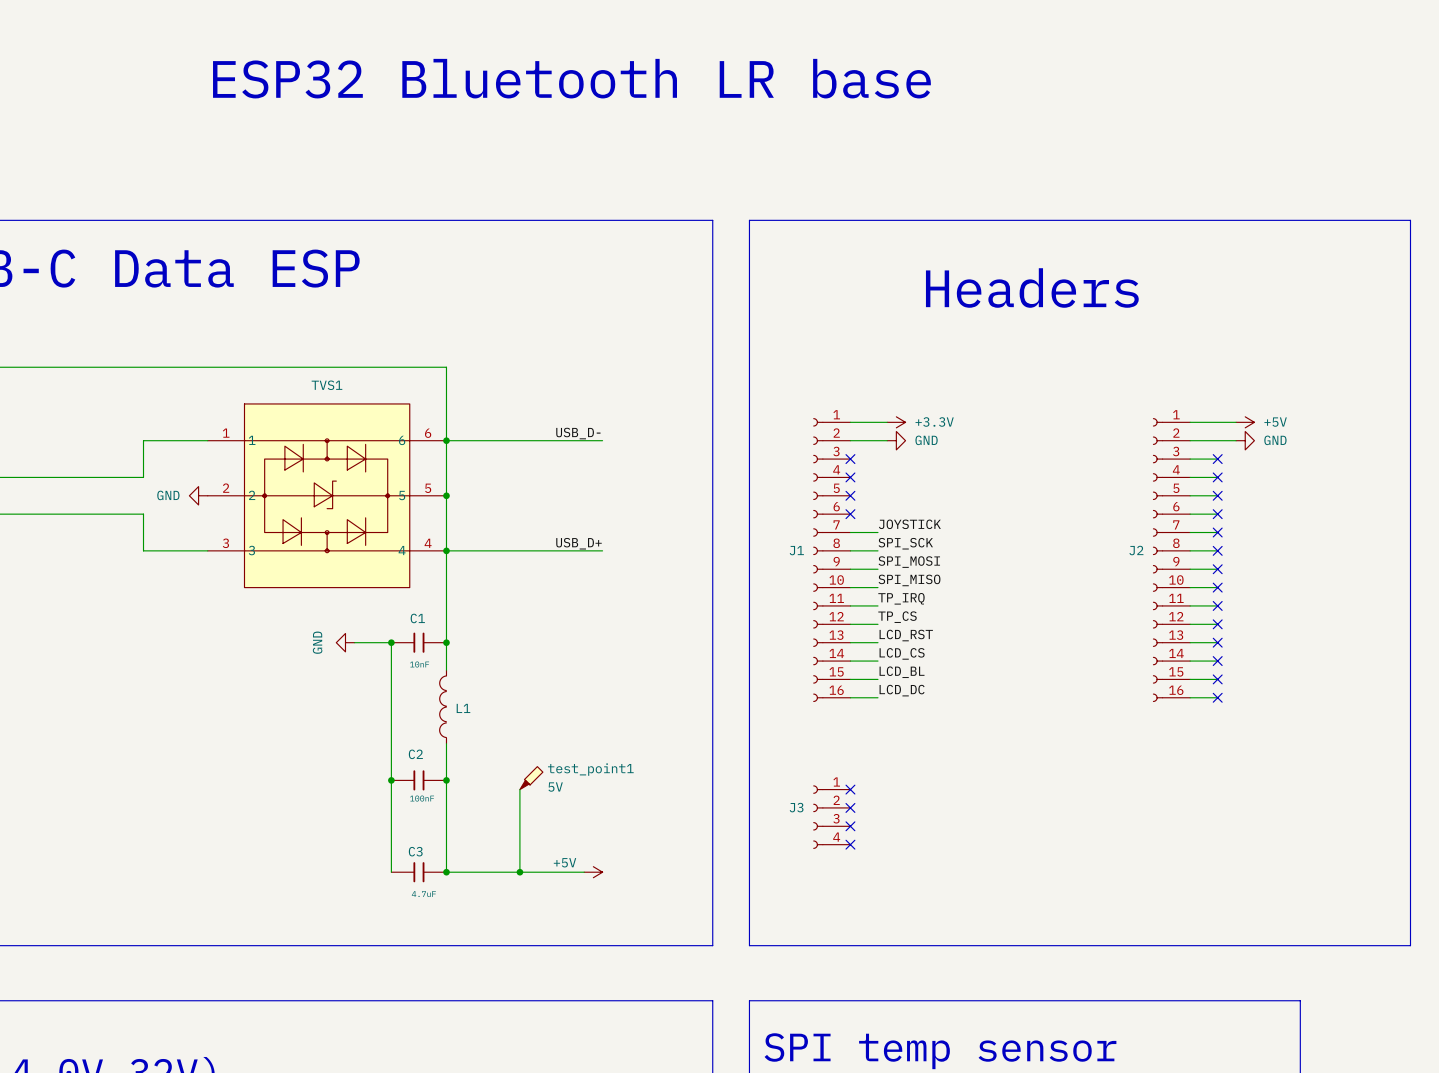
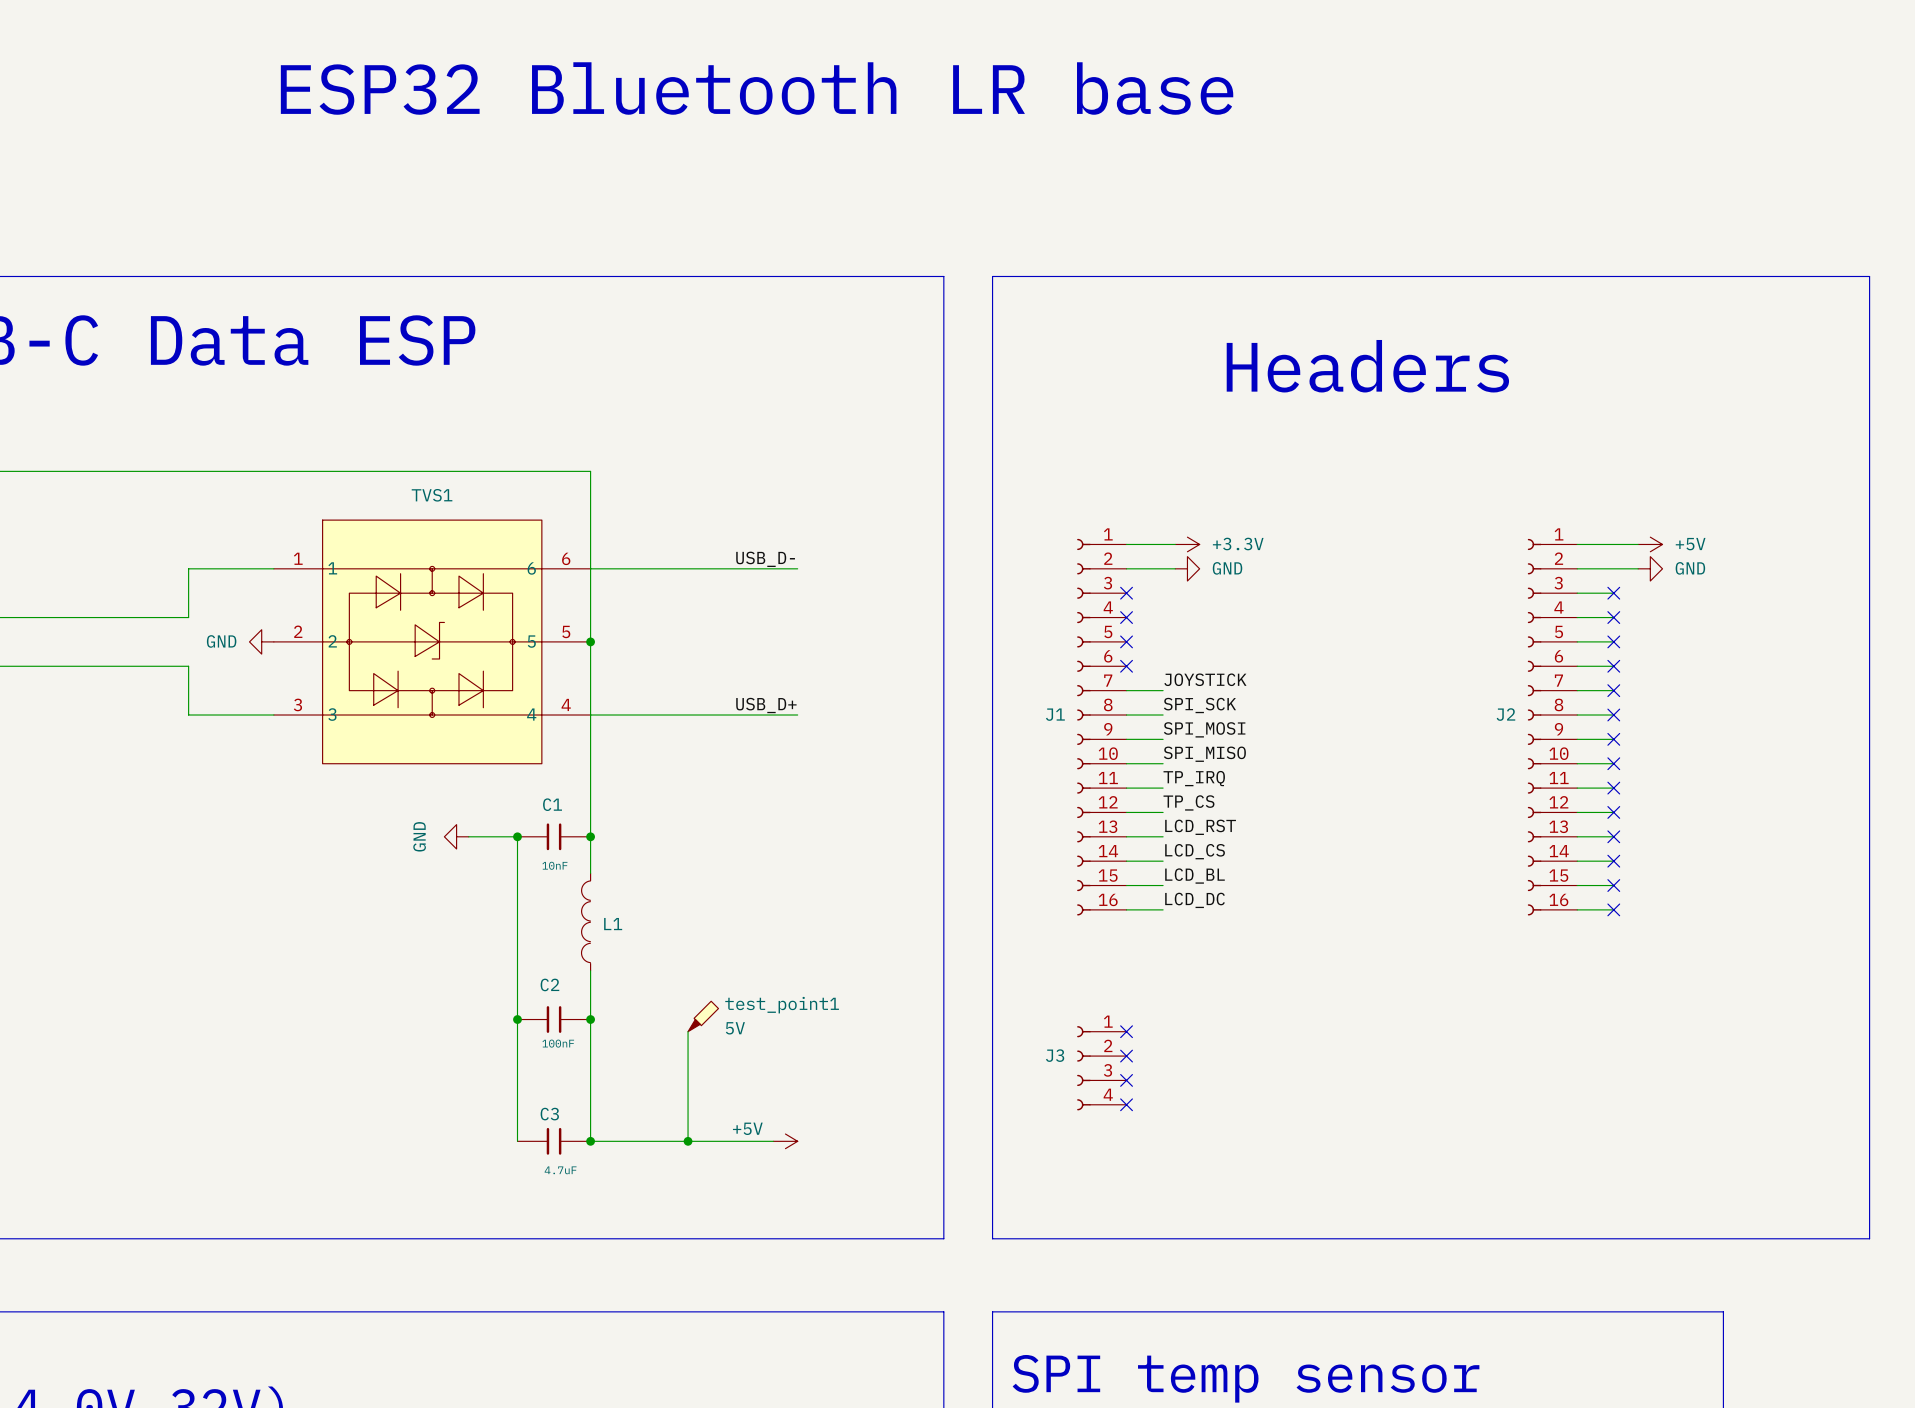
junction: (446, 440) -> none
junction: (446, 550) -> none

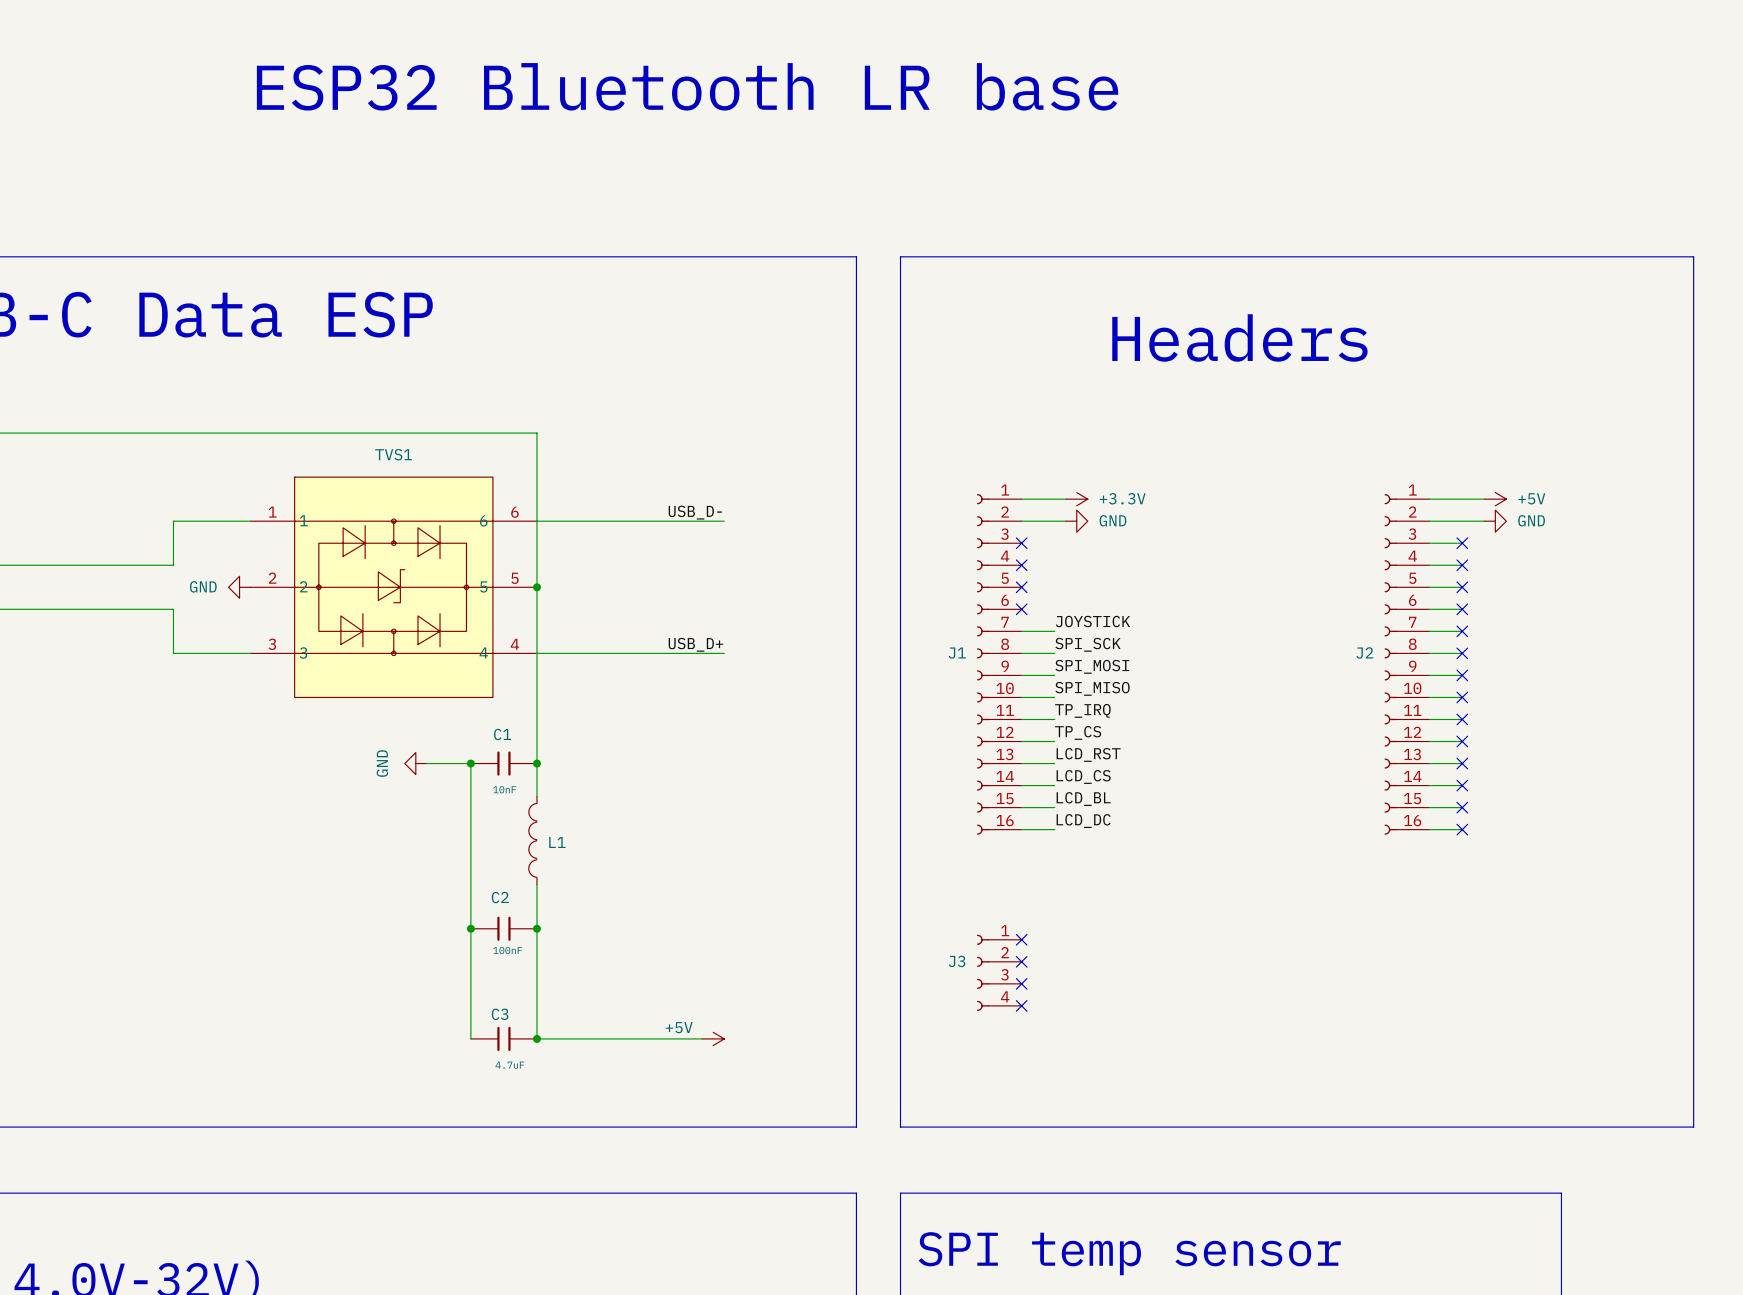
test_point1: 5V (703, 1016) -> none
wire: (688, 1031) (688, 1141) -> none
junction: (688, 1141) -> none

